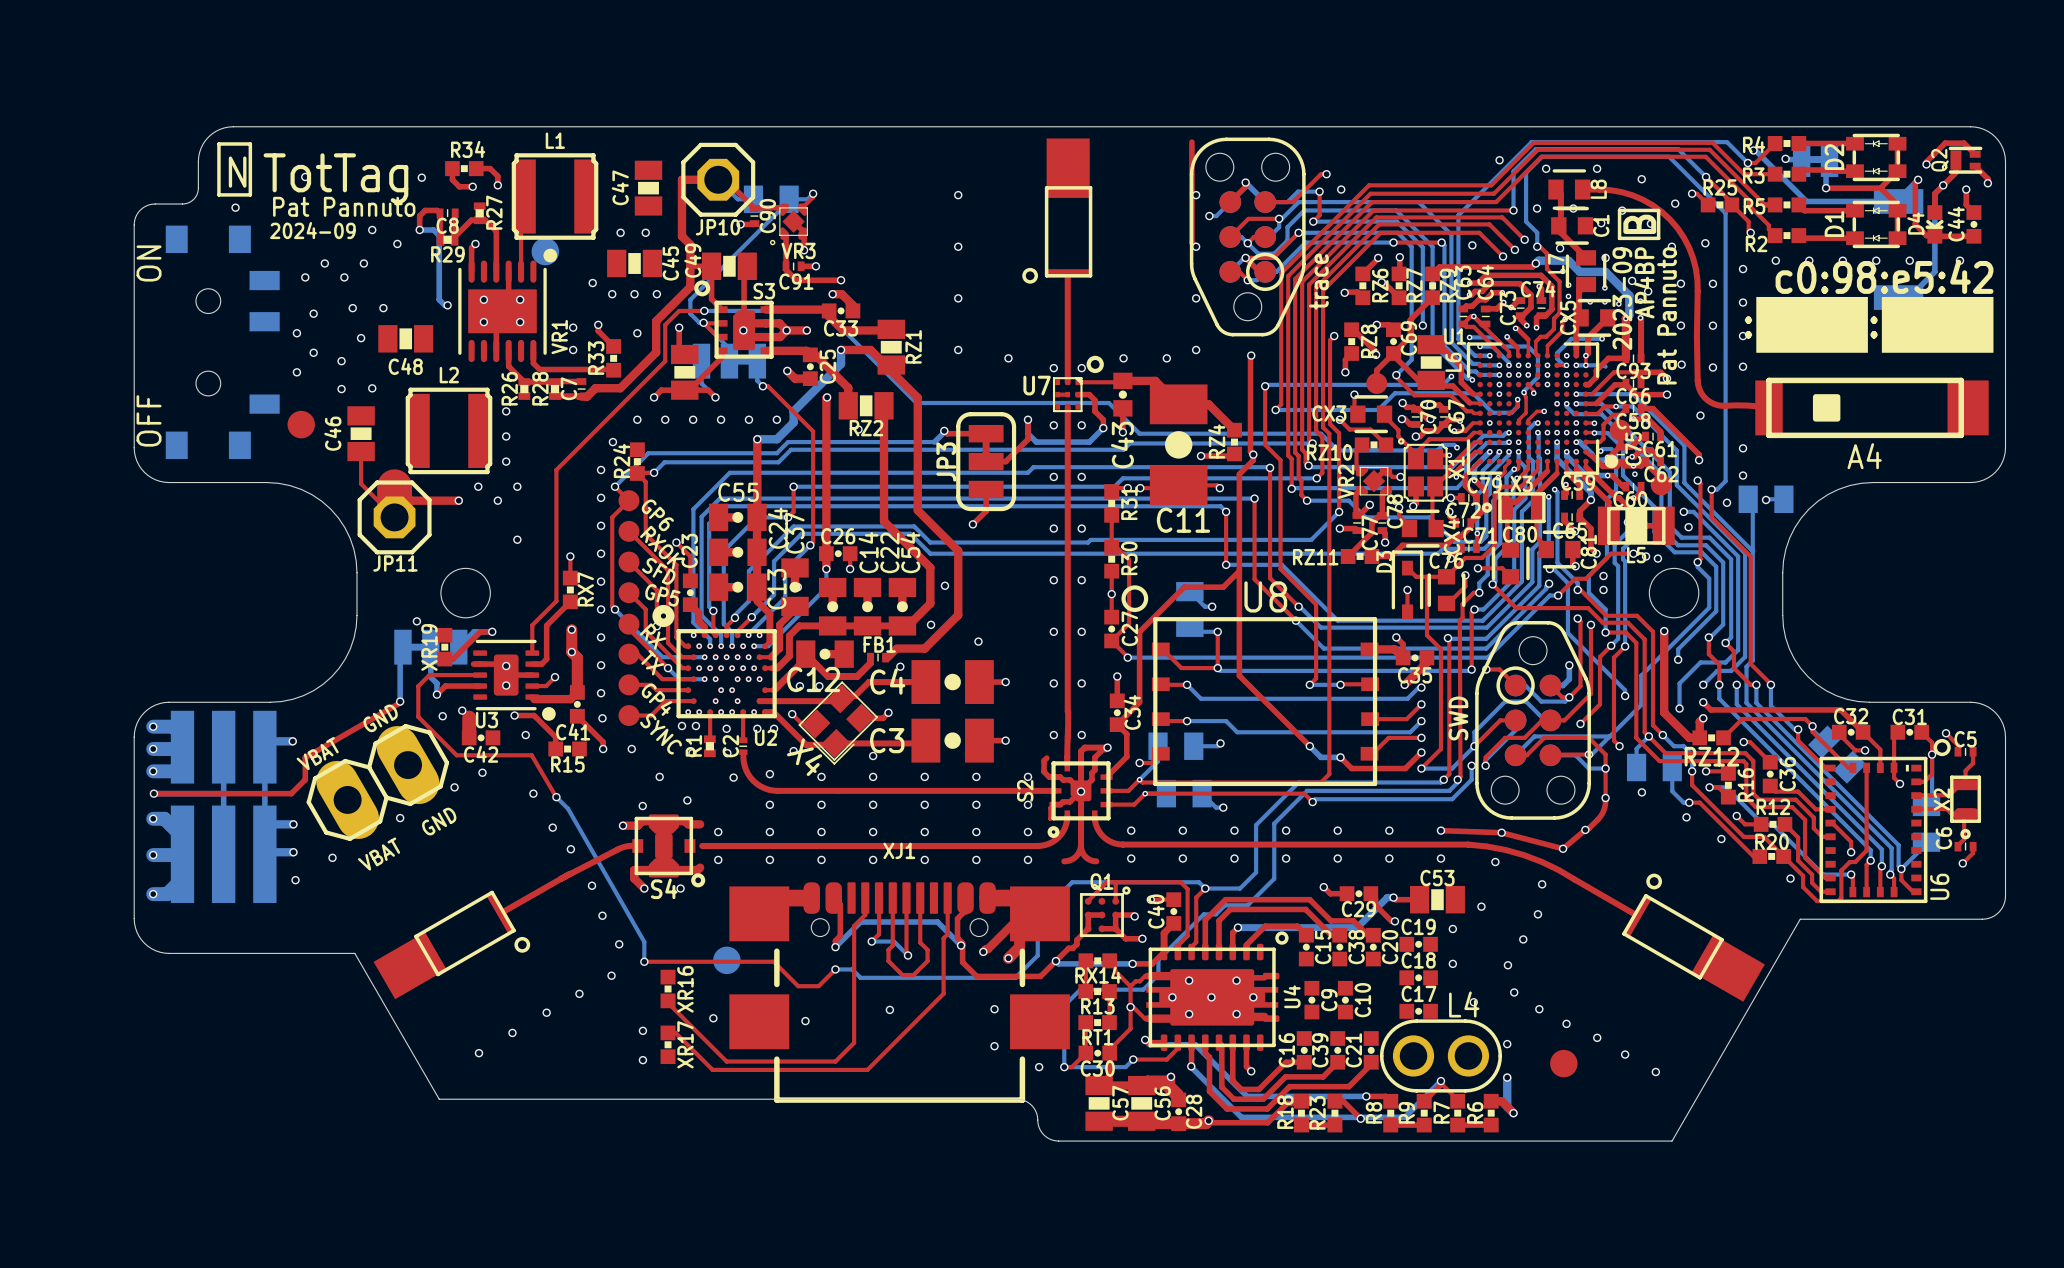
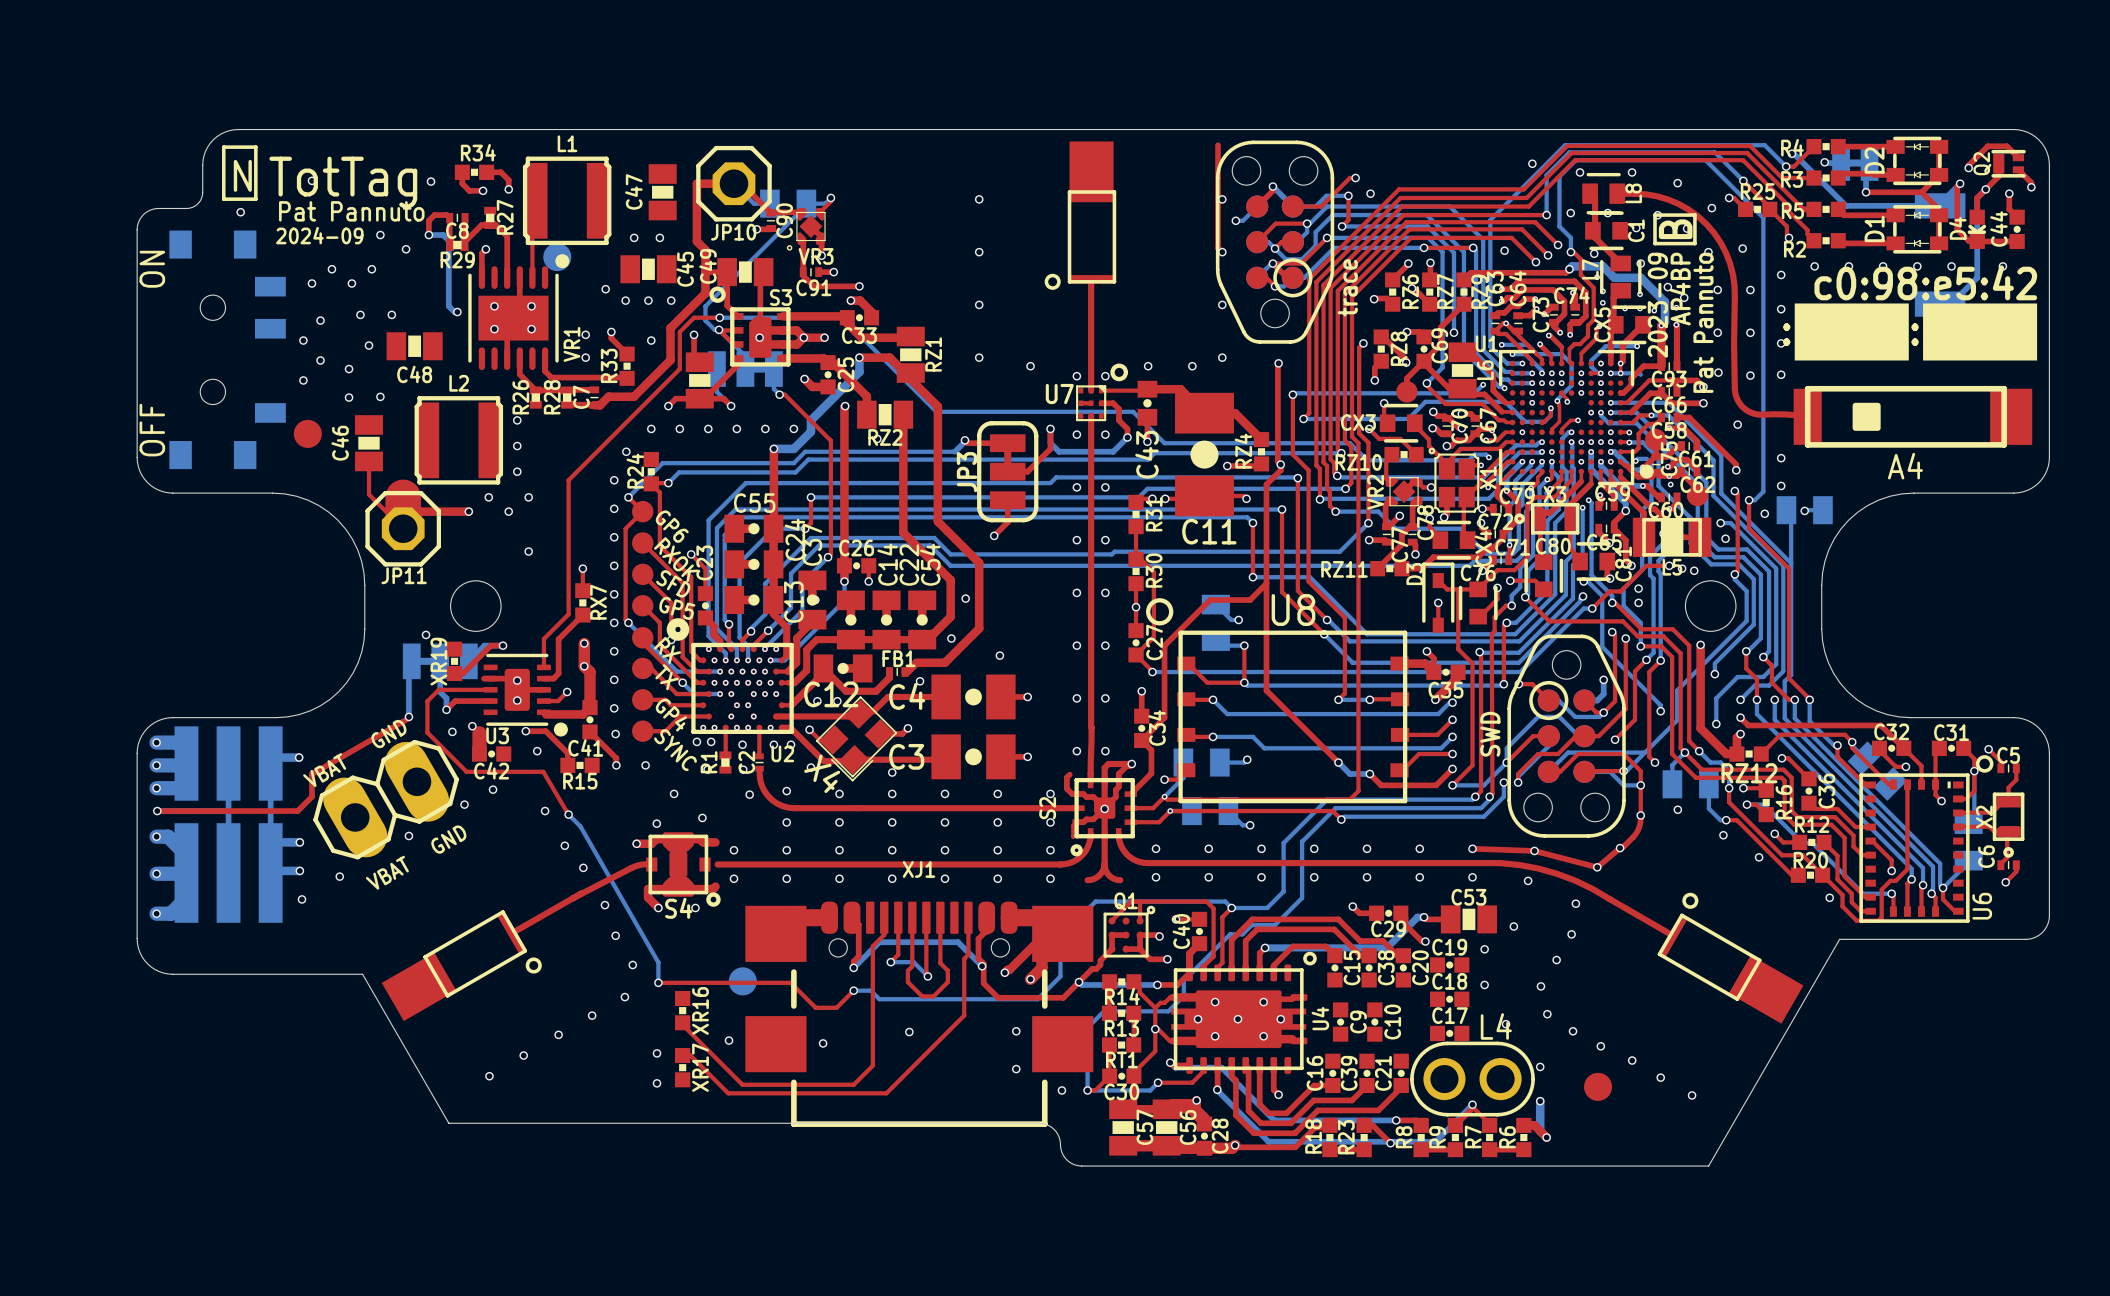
RX14 name: RX14 (1098, 975) -> R14 (1122, 996)

